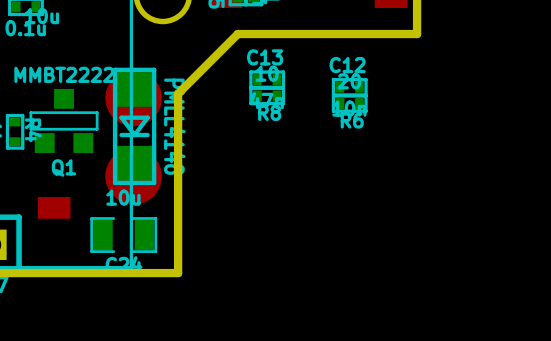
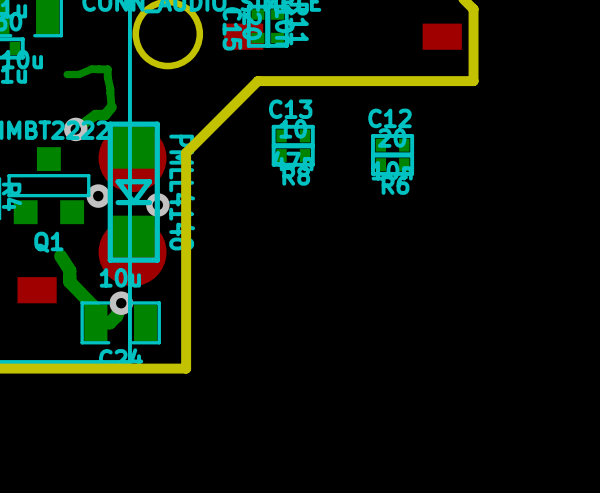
bottom track: none -> (67, 74) (78, 74) (91, 69) (107, 69) (111, 107) (105, 115) (95, 115) (75, 129)
via: none -> (75, 129)
via: none -> (98, 196)
via: none -> (157, 204)
bottom track: none -> (60, 256) (69, 270) (69, 281) (93, 306) (93, 329) (98, 322) (109, 322) (116, 316) (121, 303)
via: none -> (121, 303)

